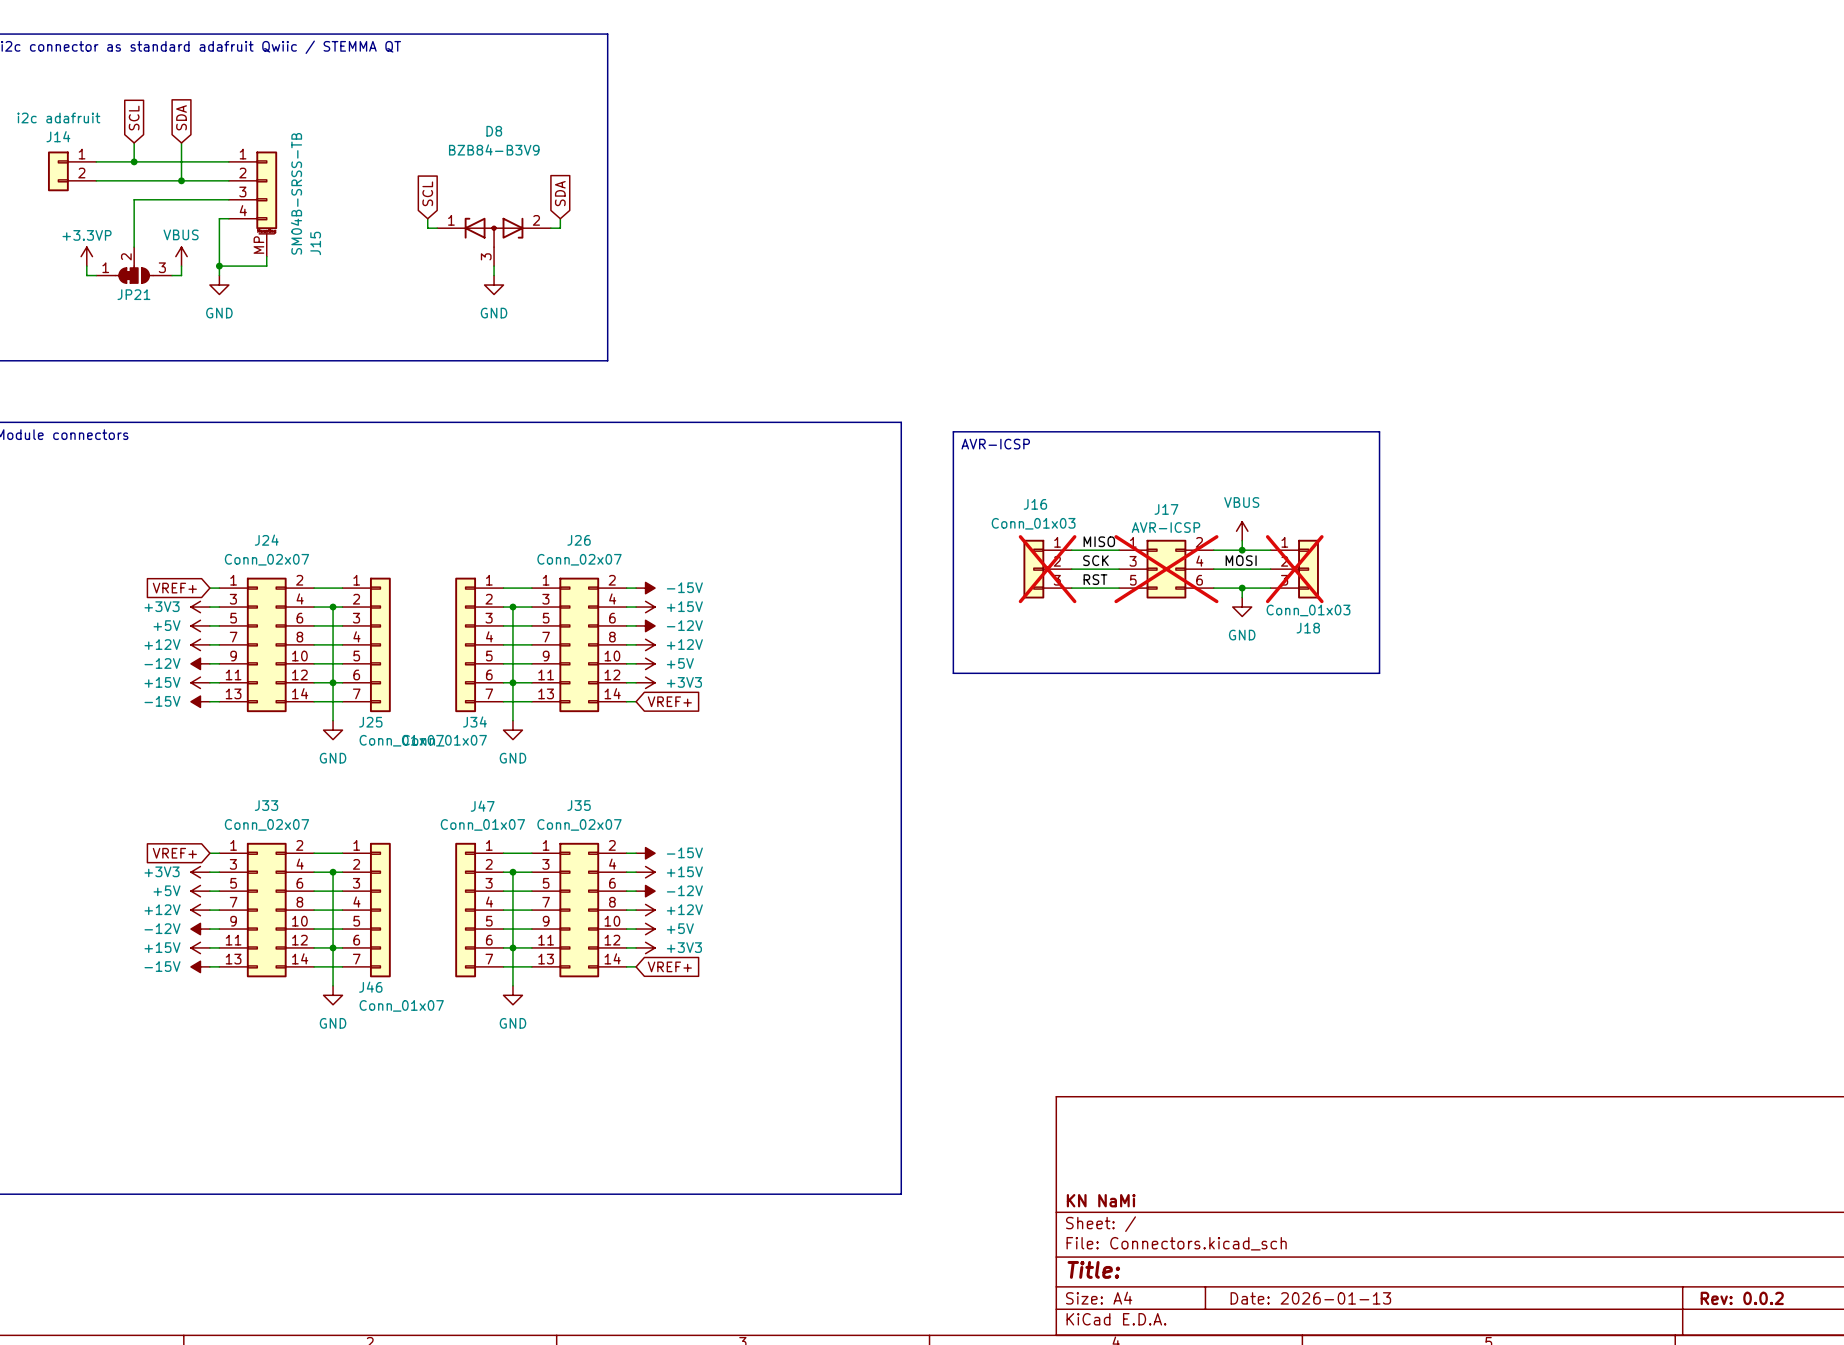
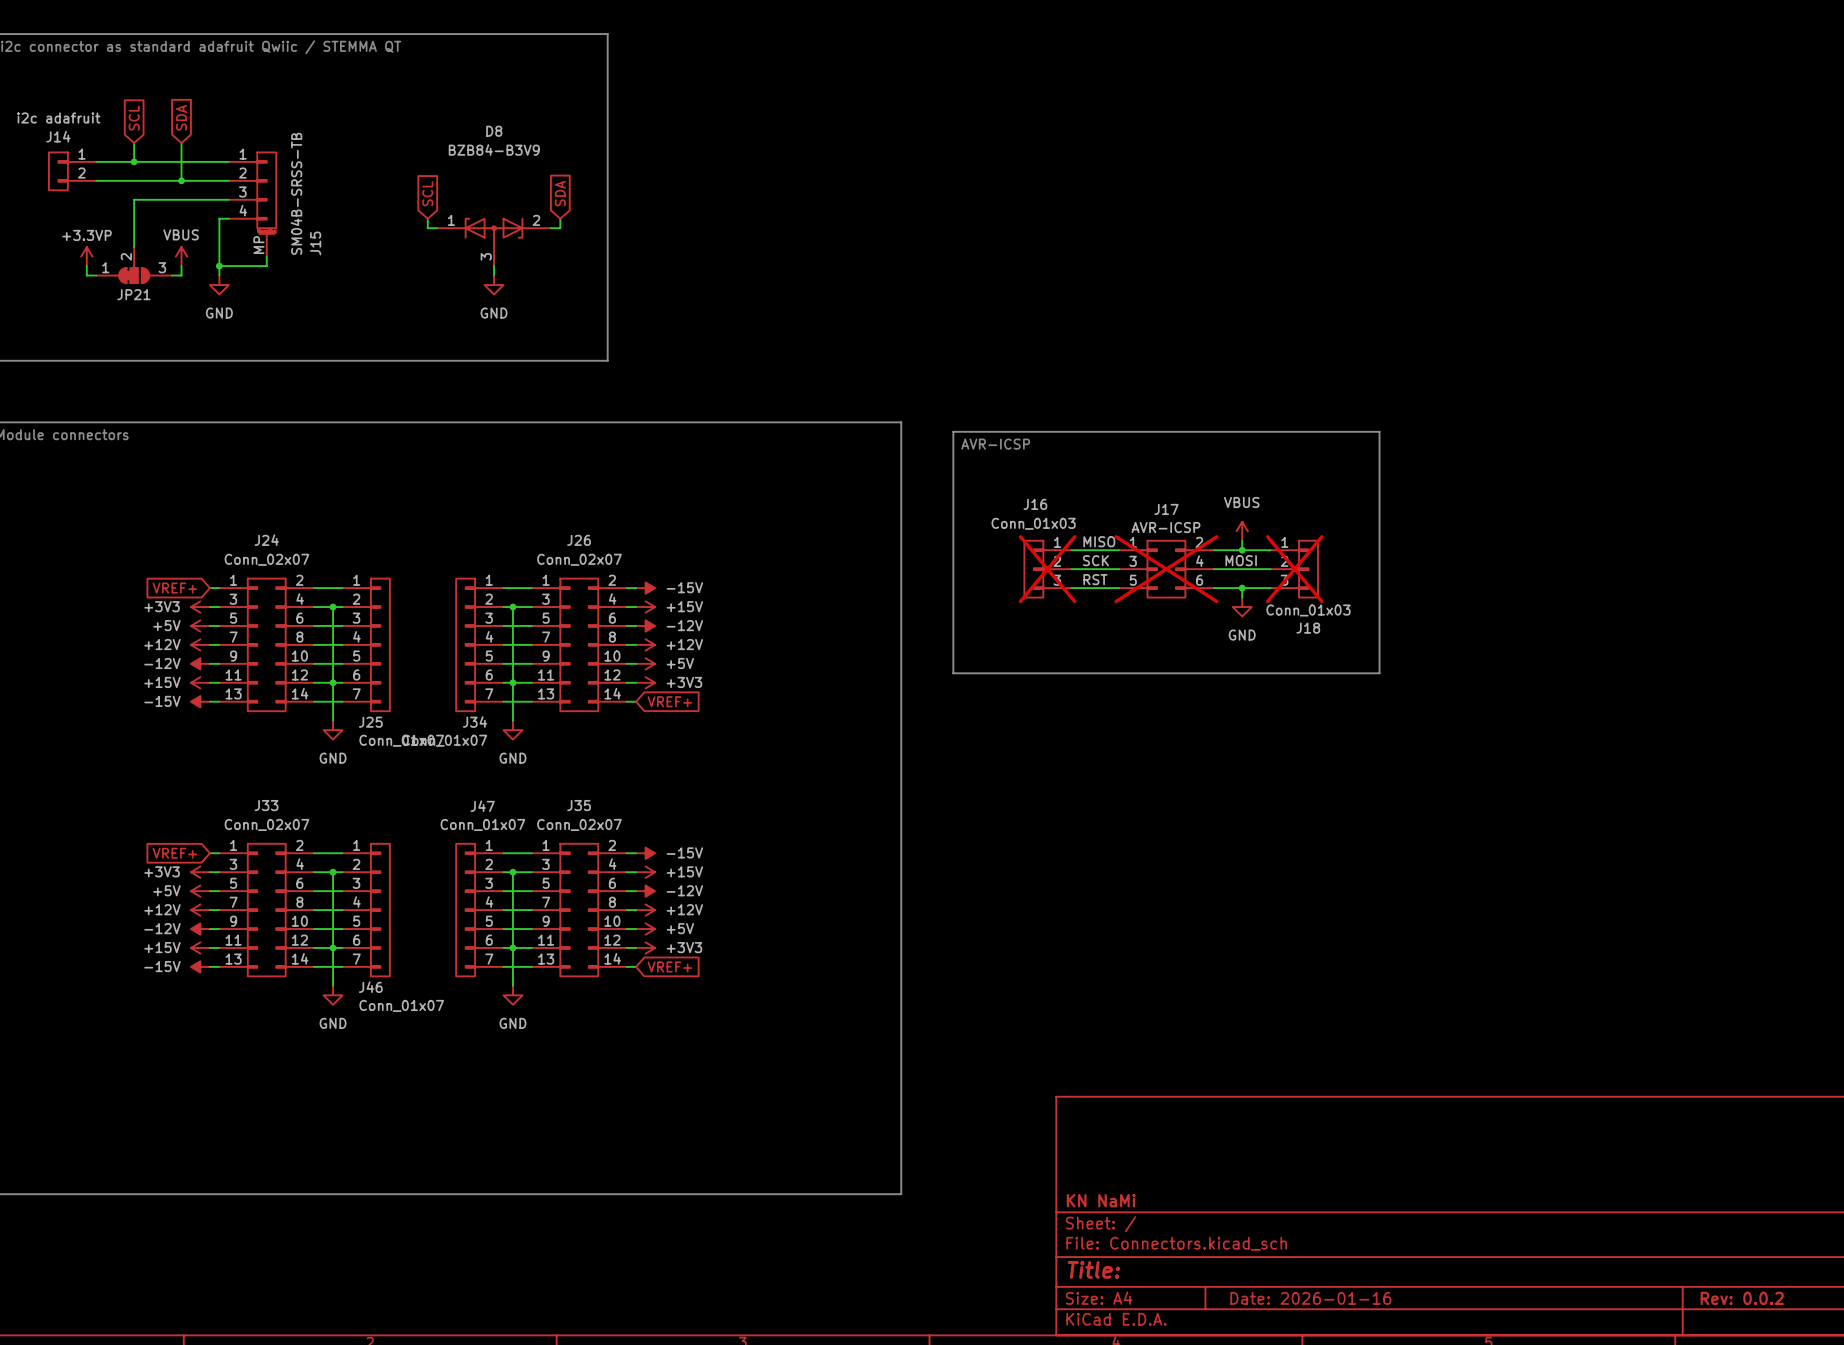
title block: Date: 2026-01-13 (1310, 1298) -> Date: 2026-01-16 (1310, 1298)

